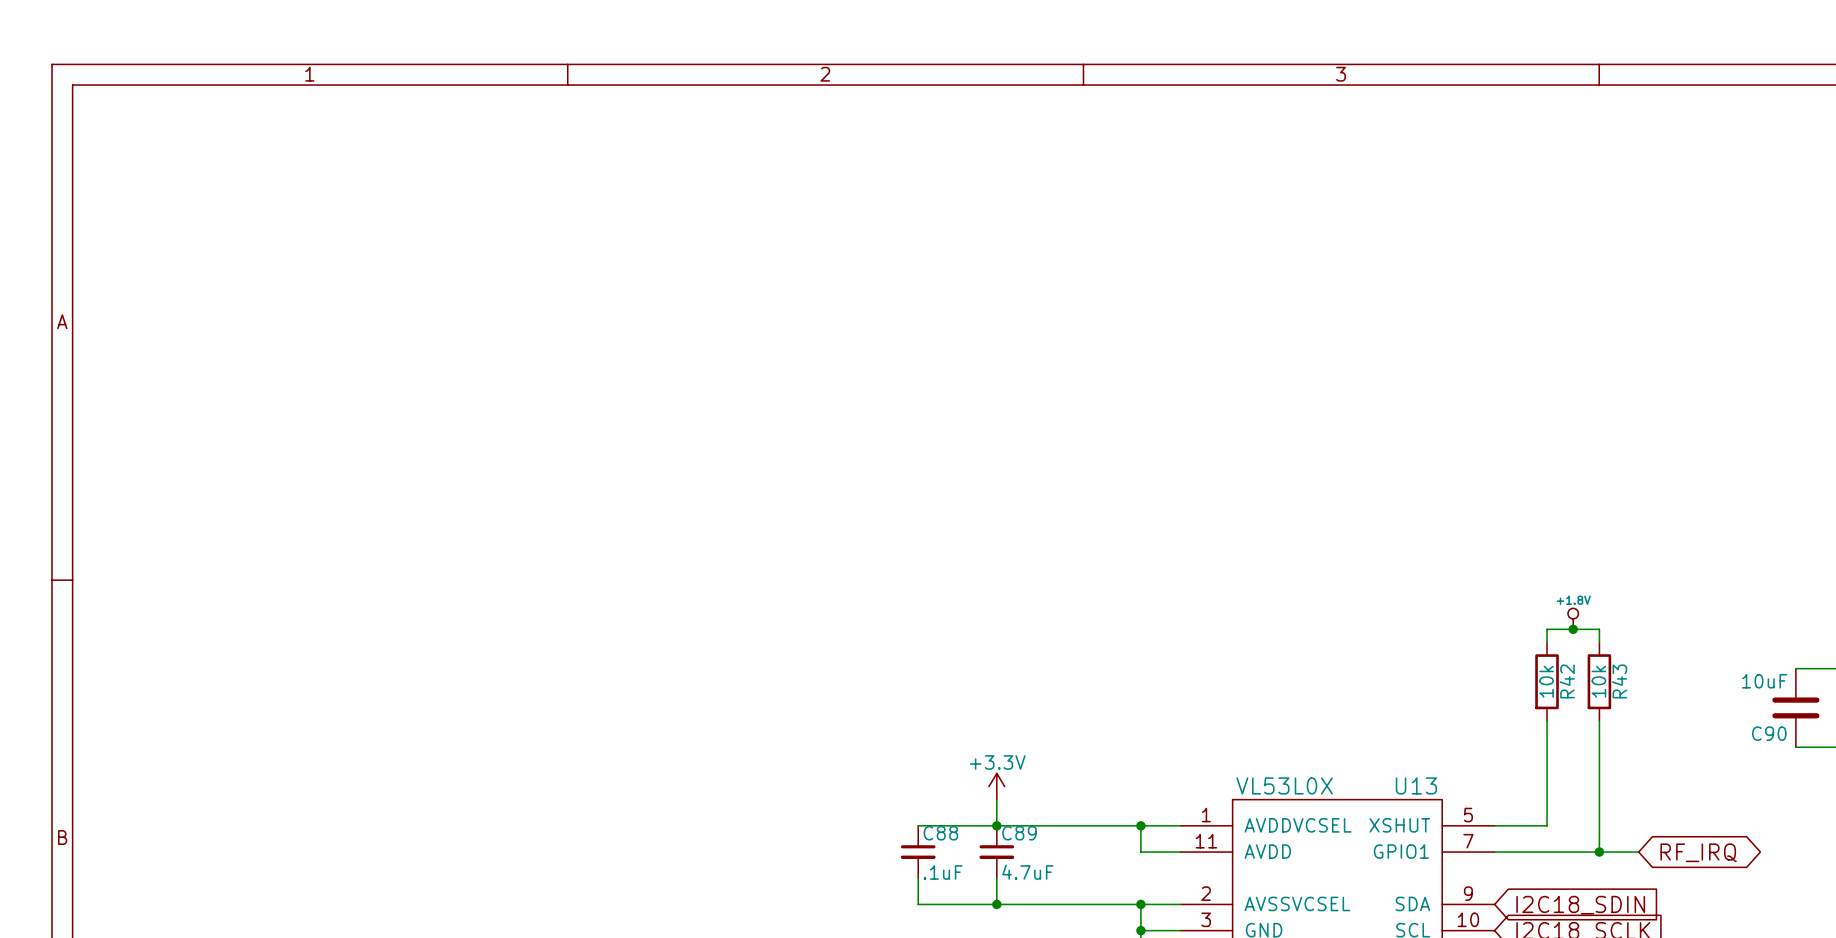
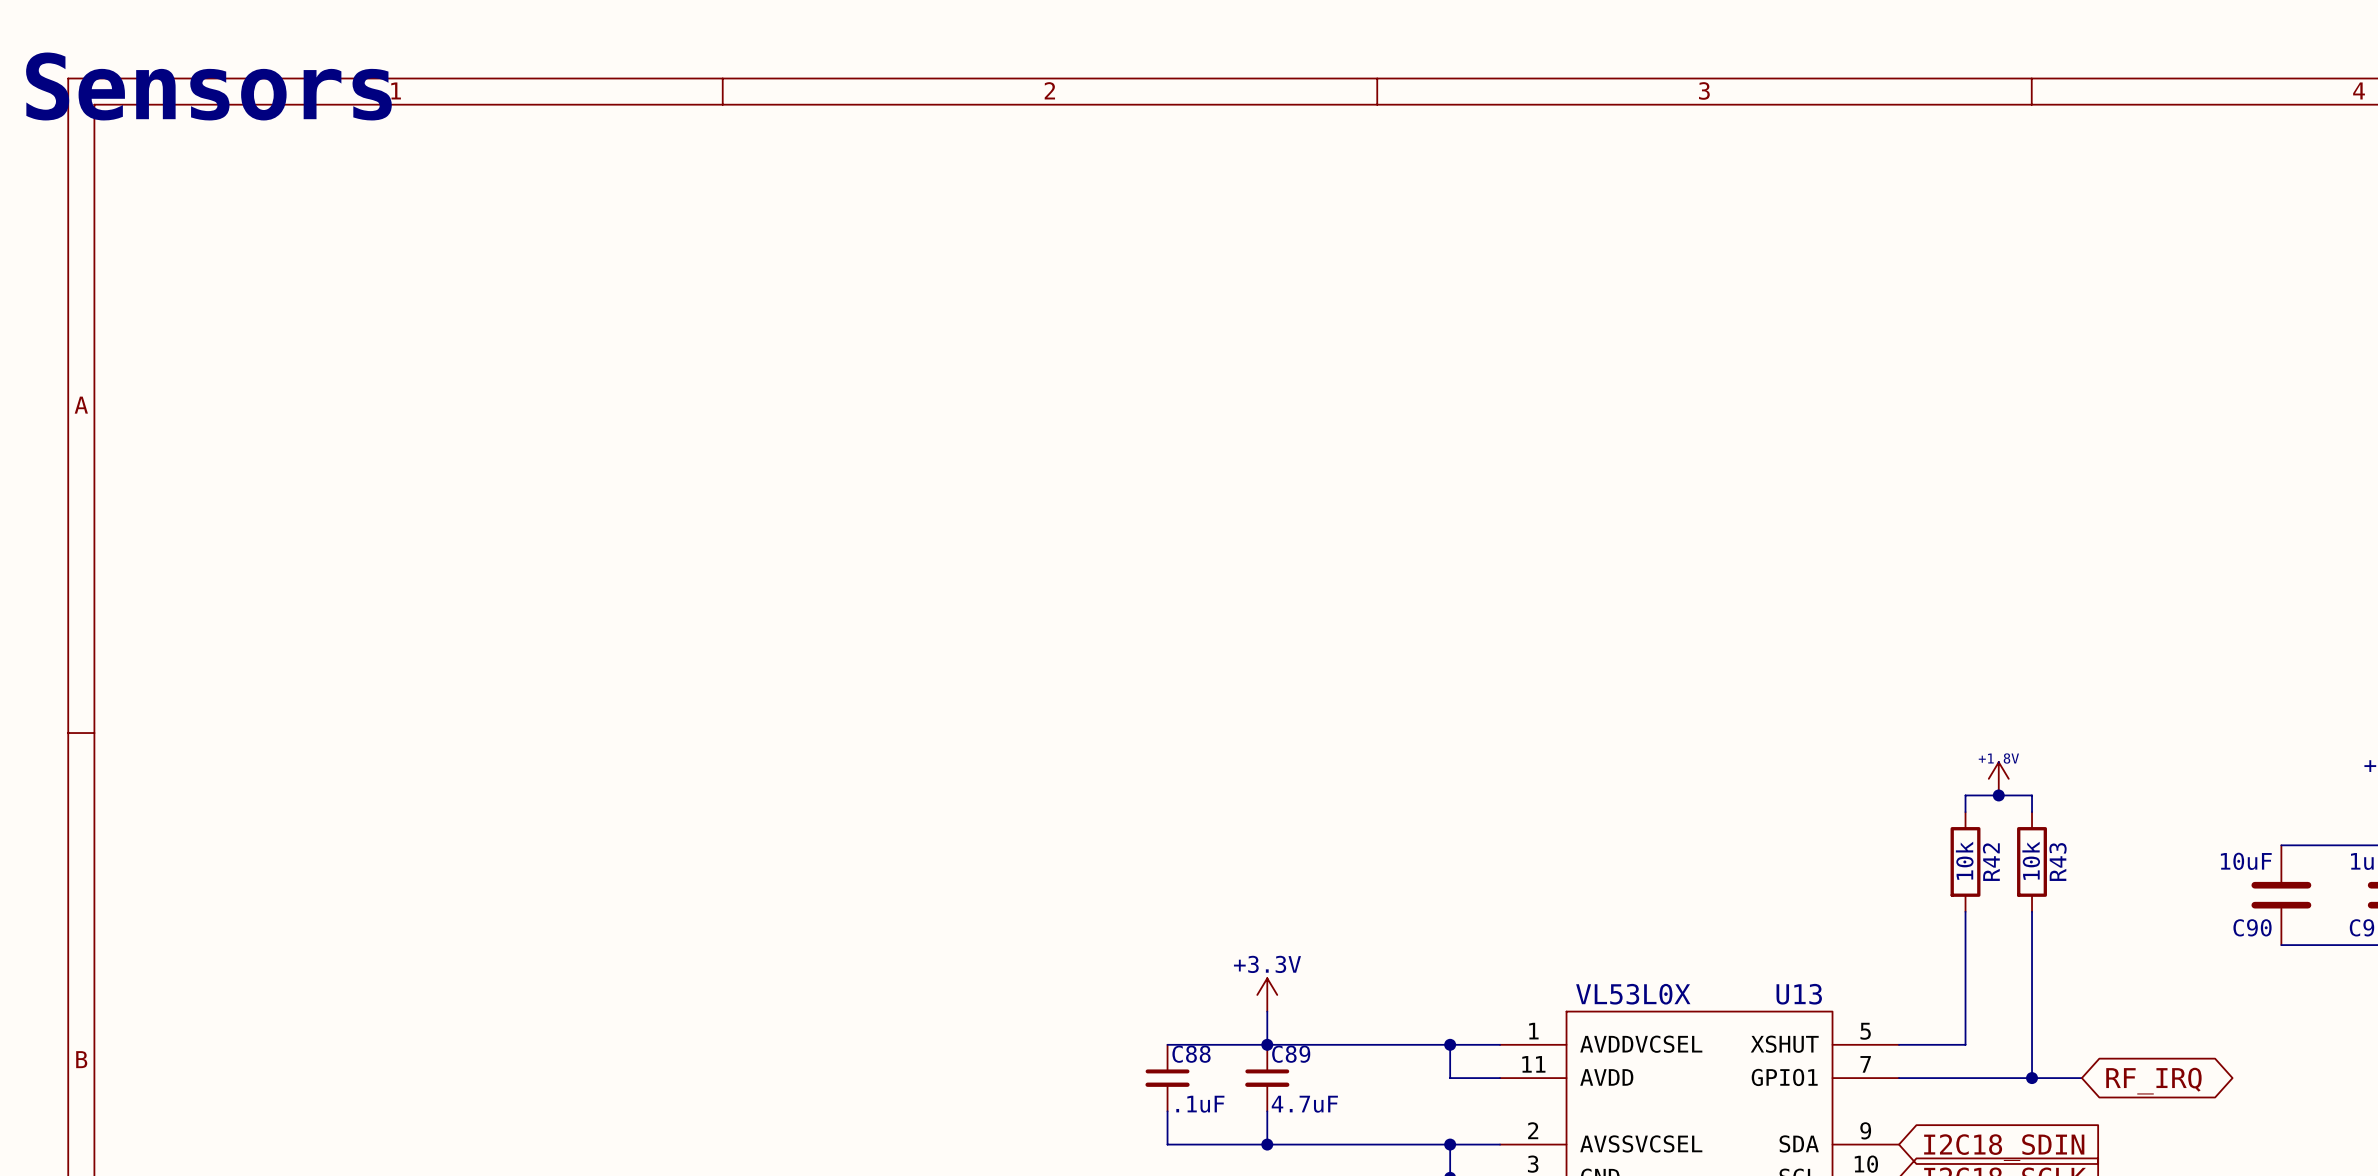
text: none -> Sensors (208, 86)
power symbol shape: [1567, 608, 1579, 630] -> [1988, 762, 2009, 796]

